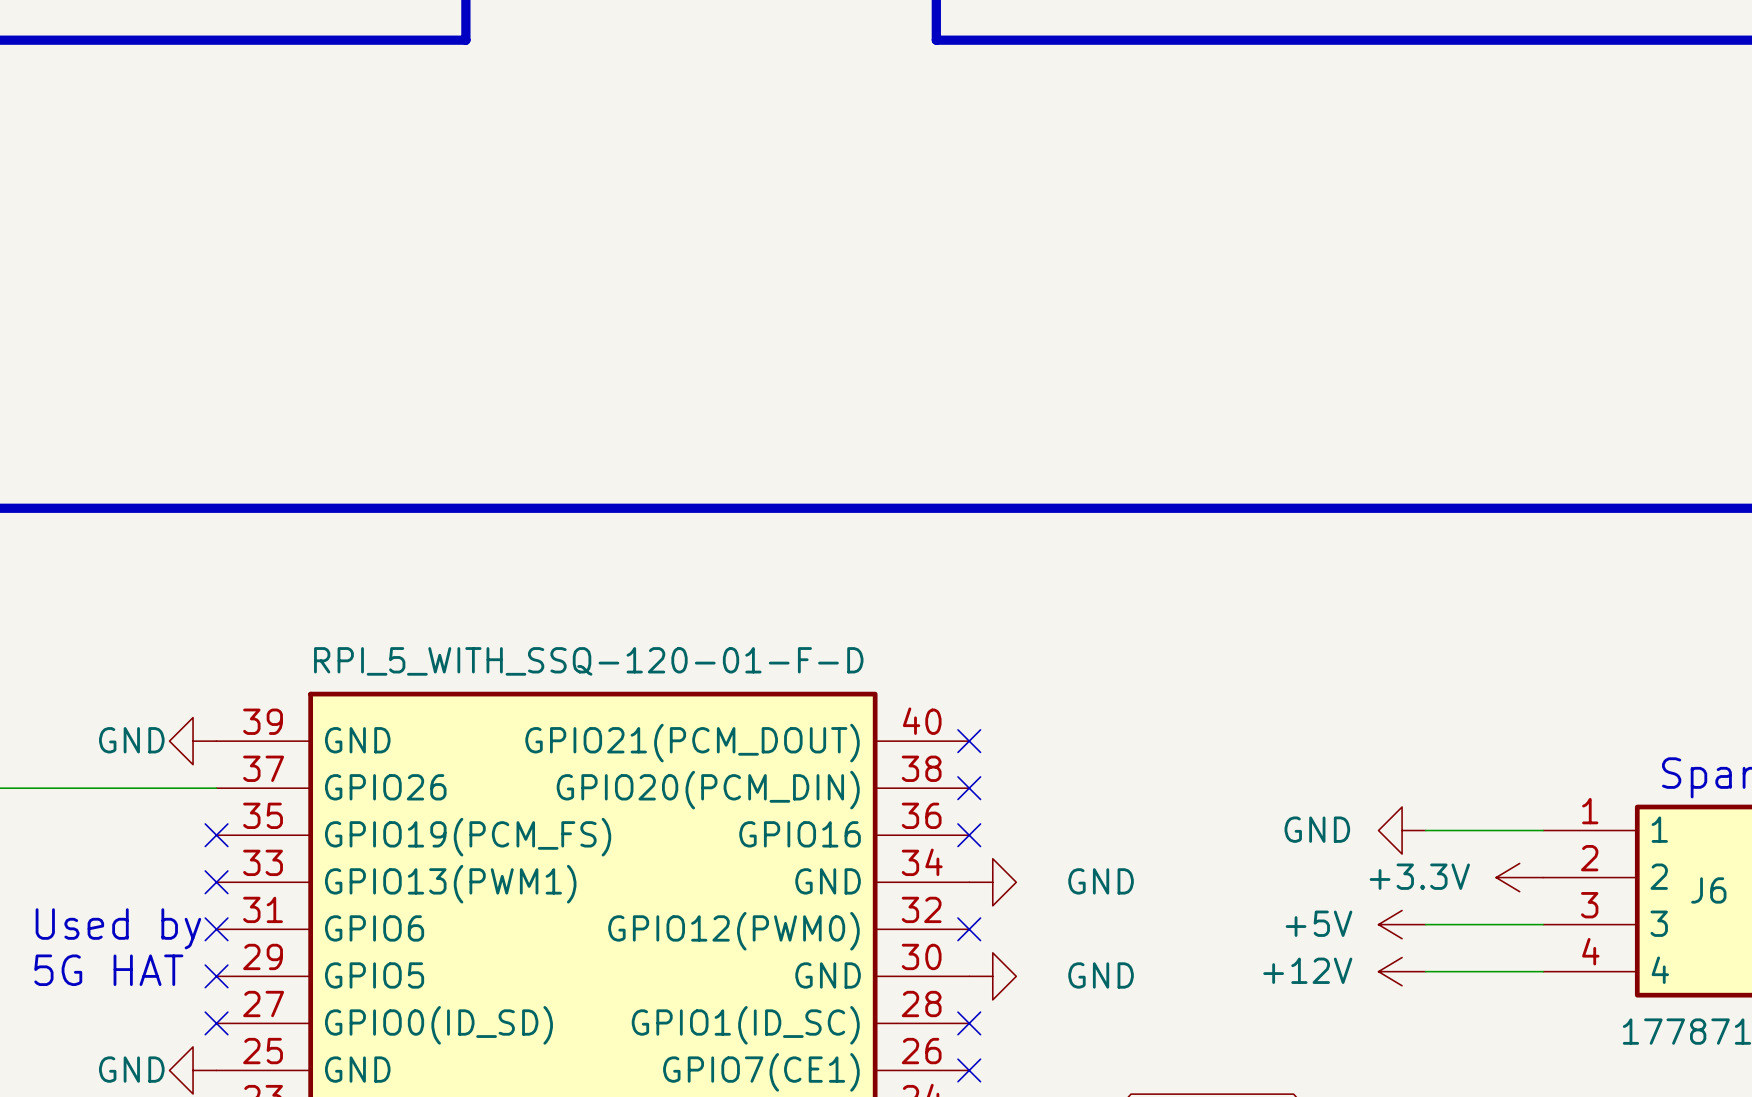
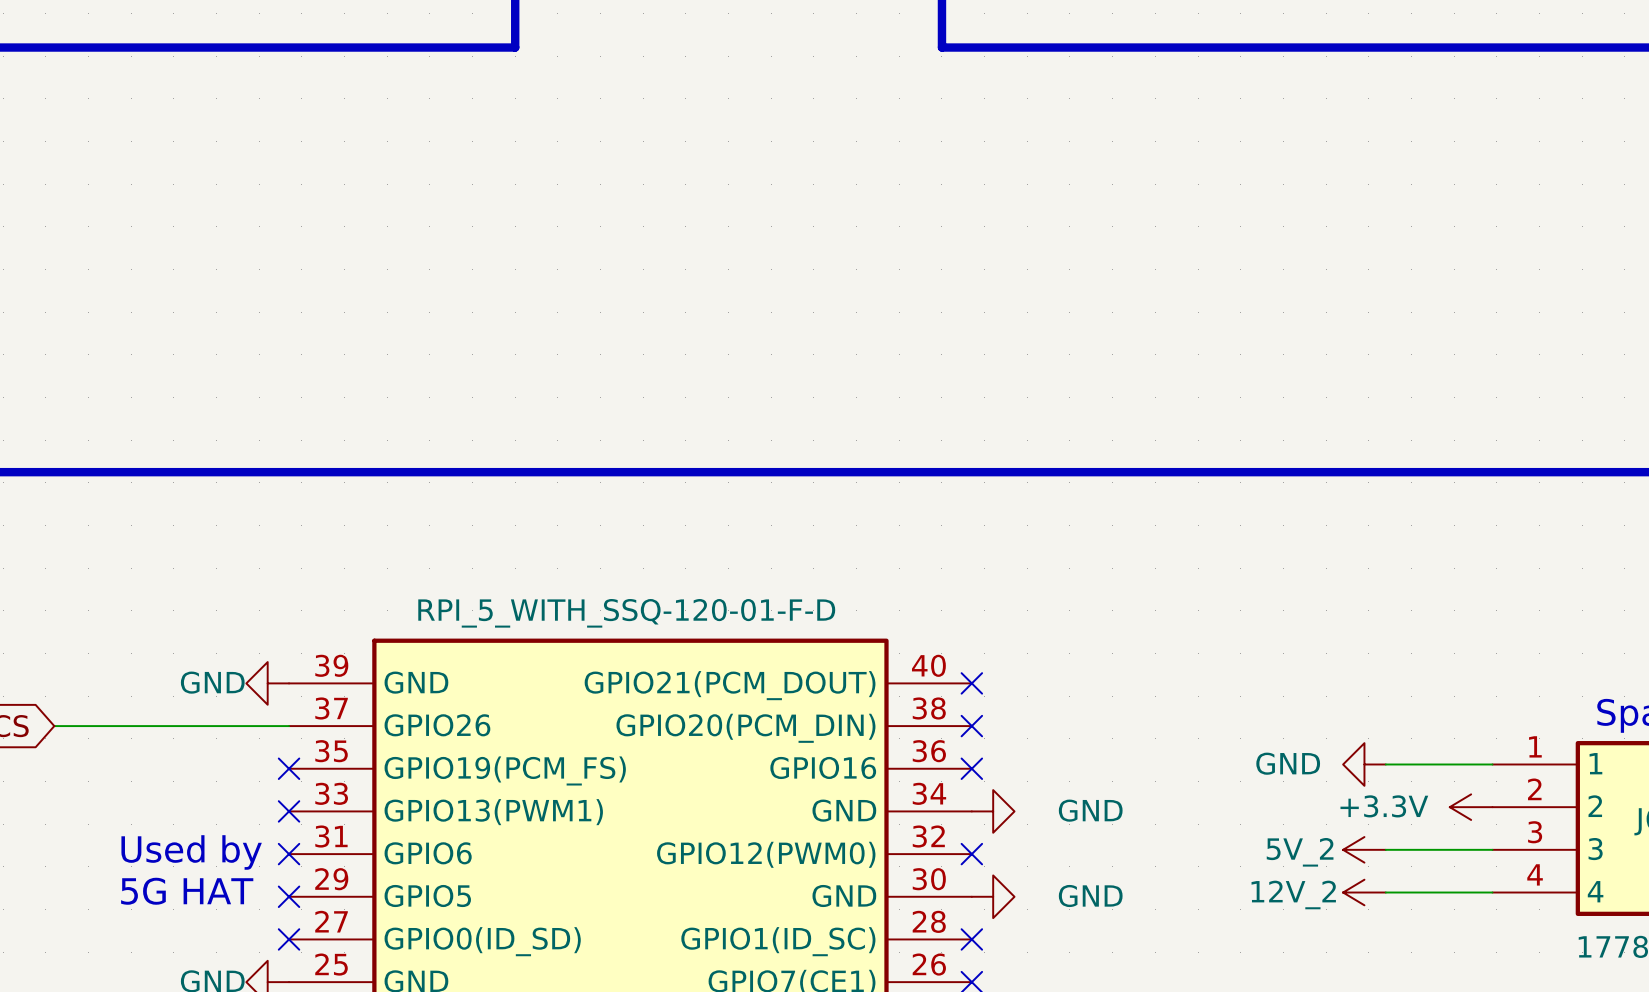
power symbol: +5V (1402, 924) -> 5V_2 (1364, 849)
power symbol: +12V (1402, 971) -> 12V_2 (1364, 892)

